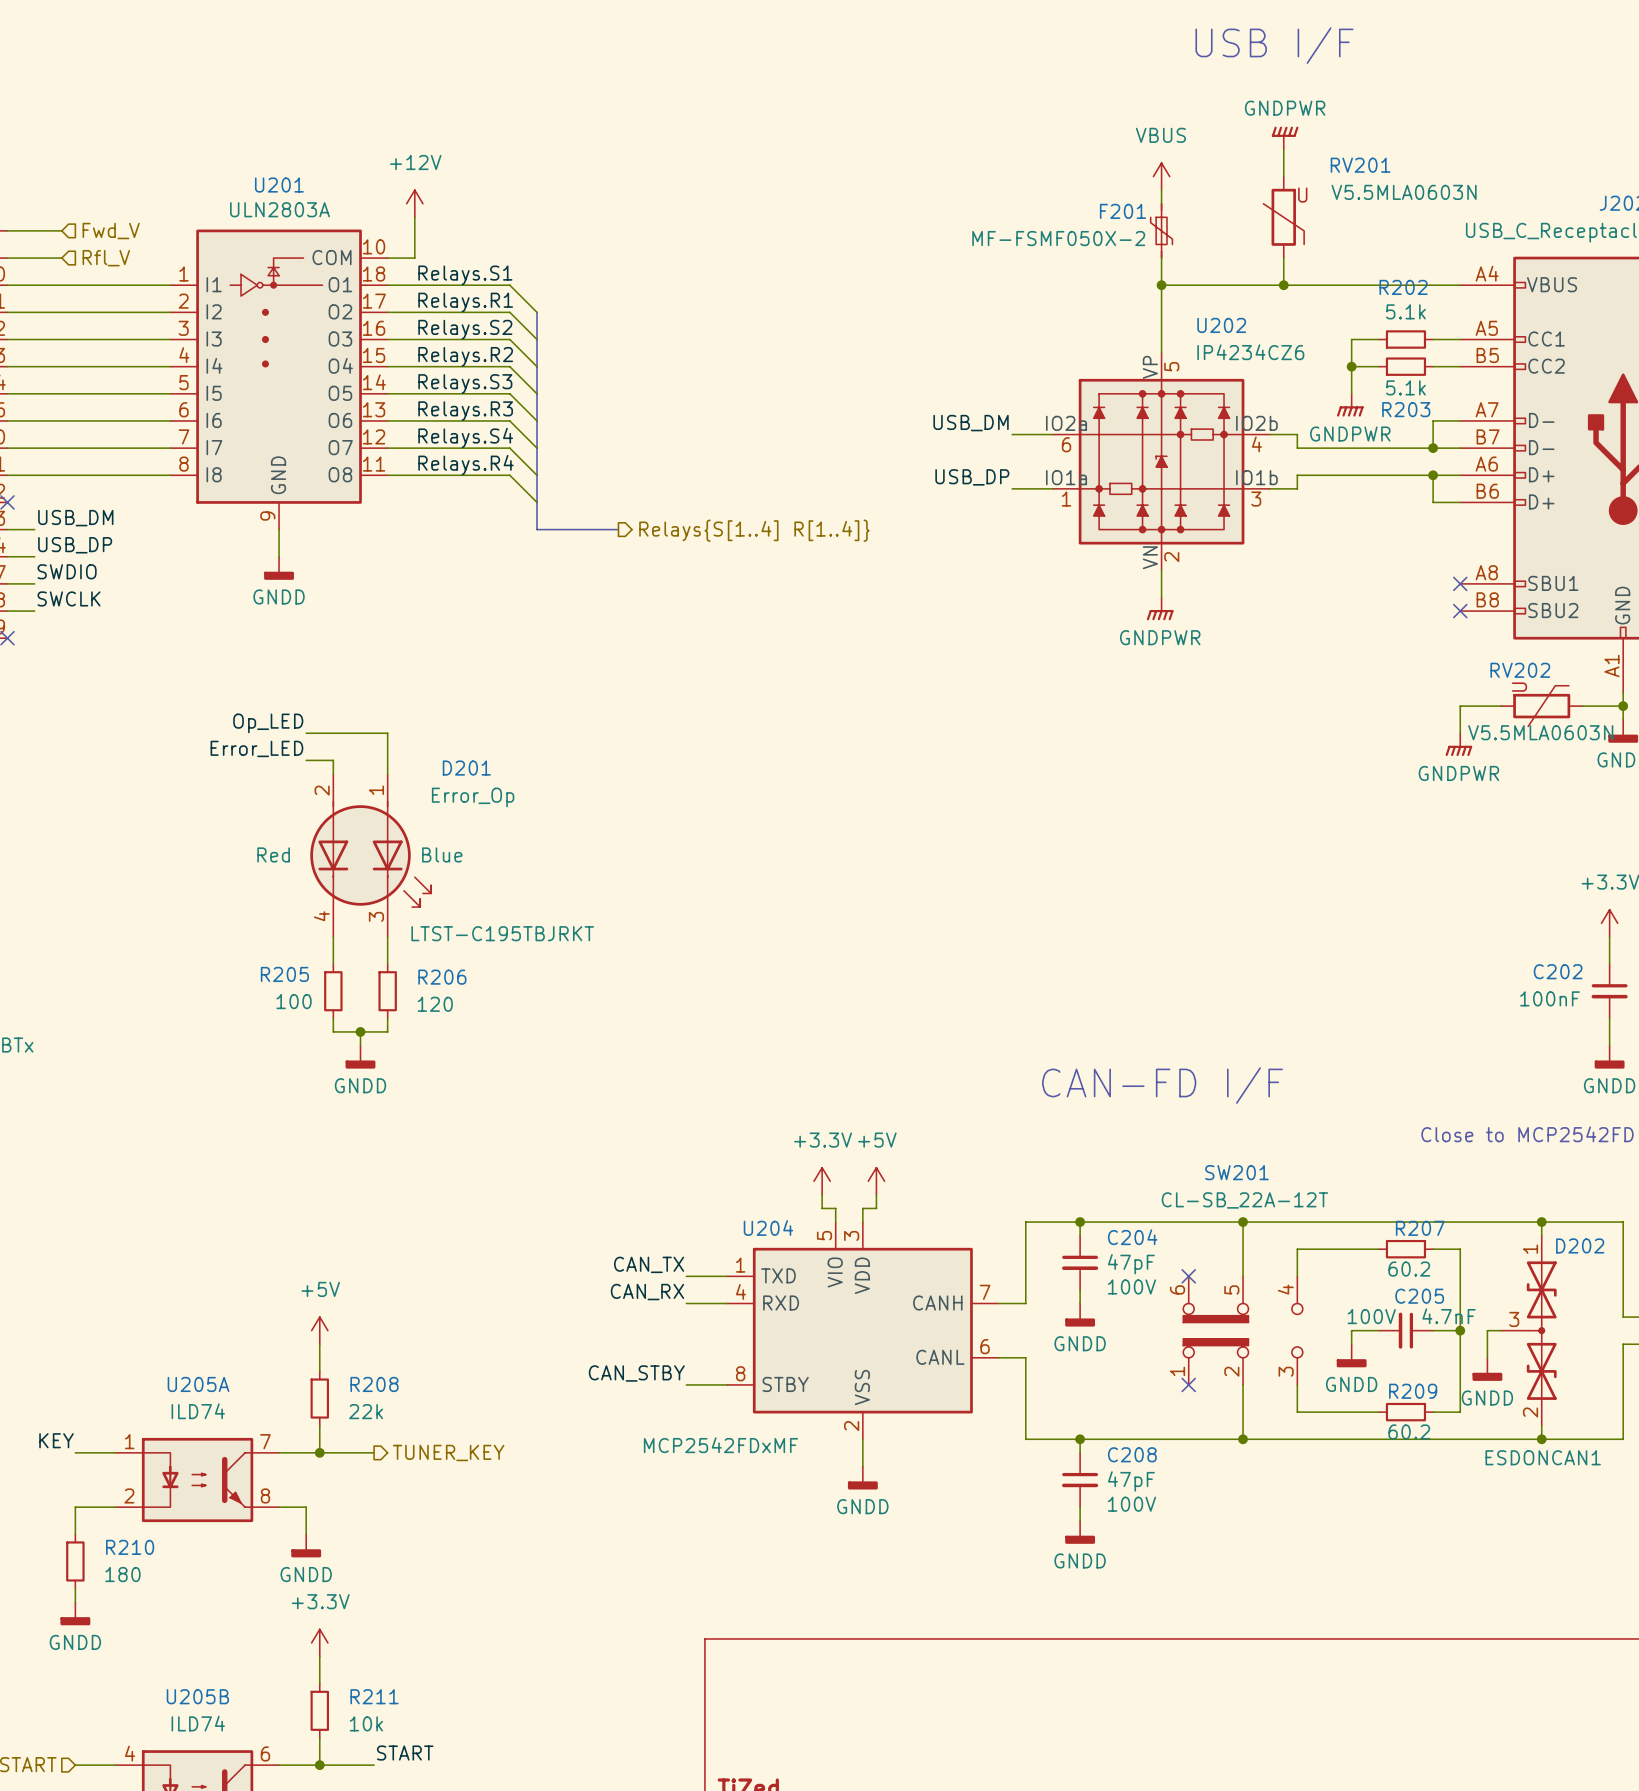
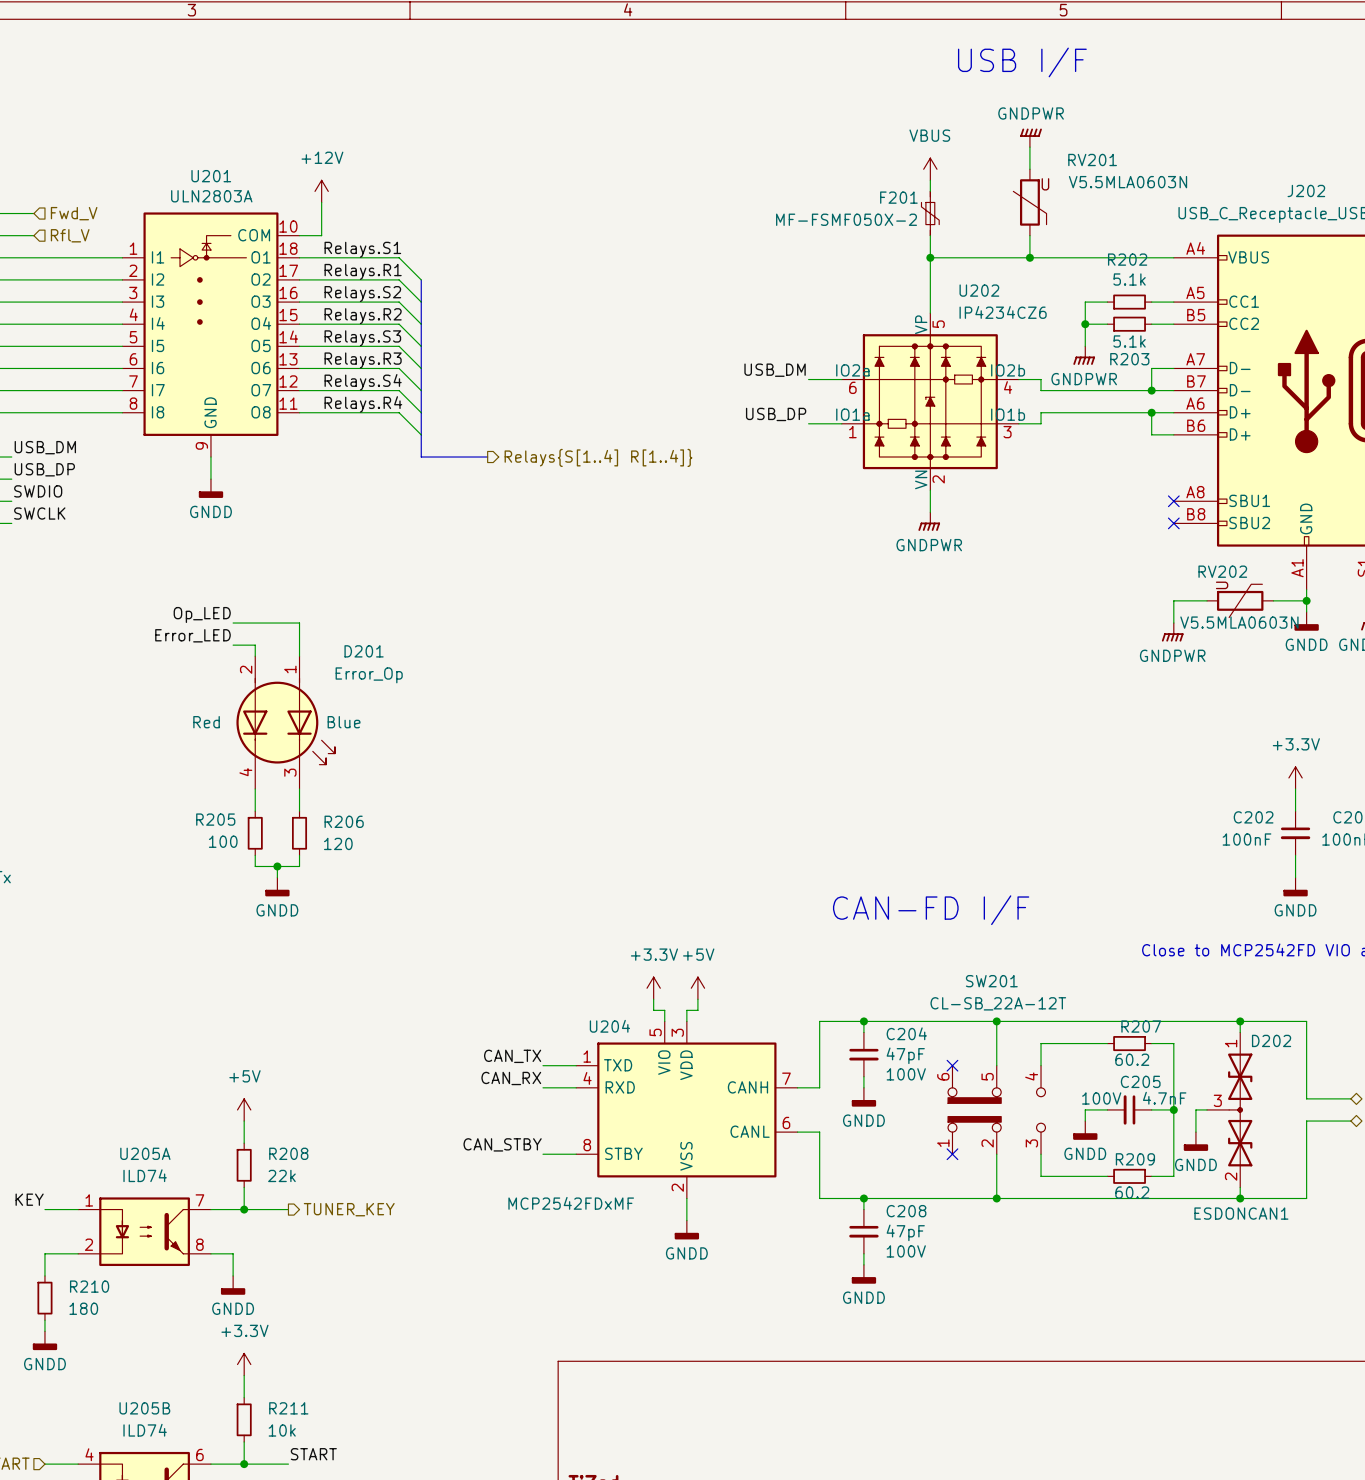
D201 text: LTST-C195TBJRKT (502, 933) -> none

